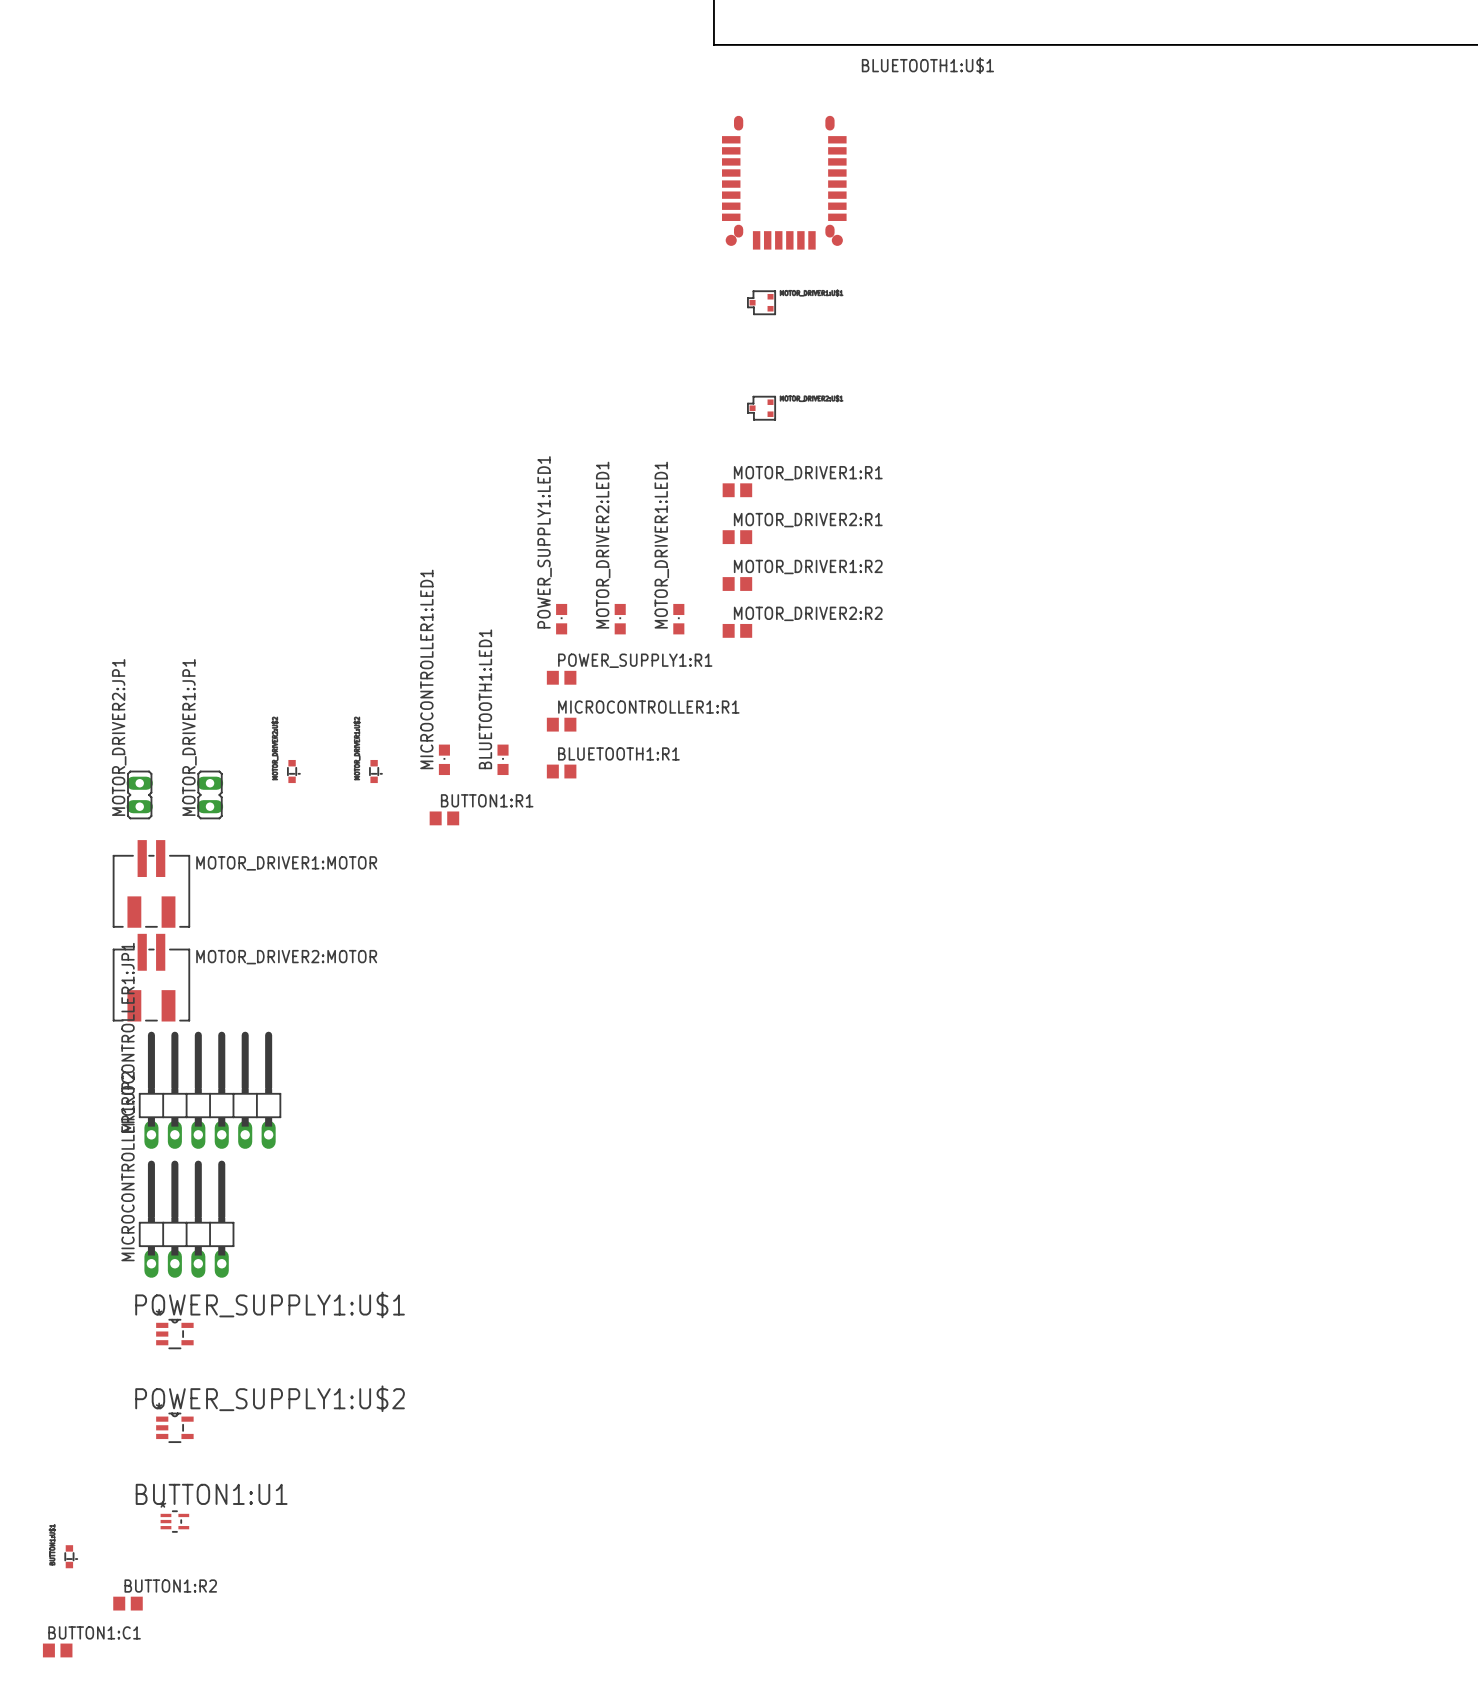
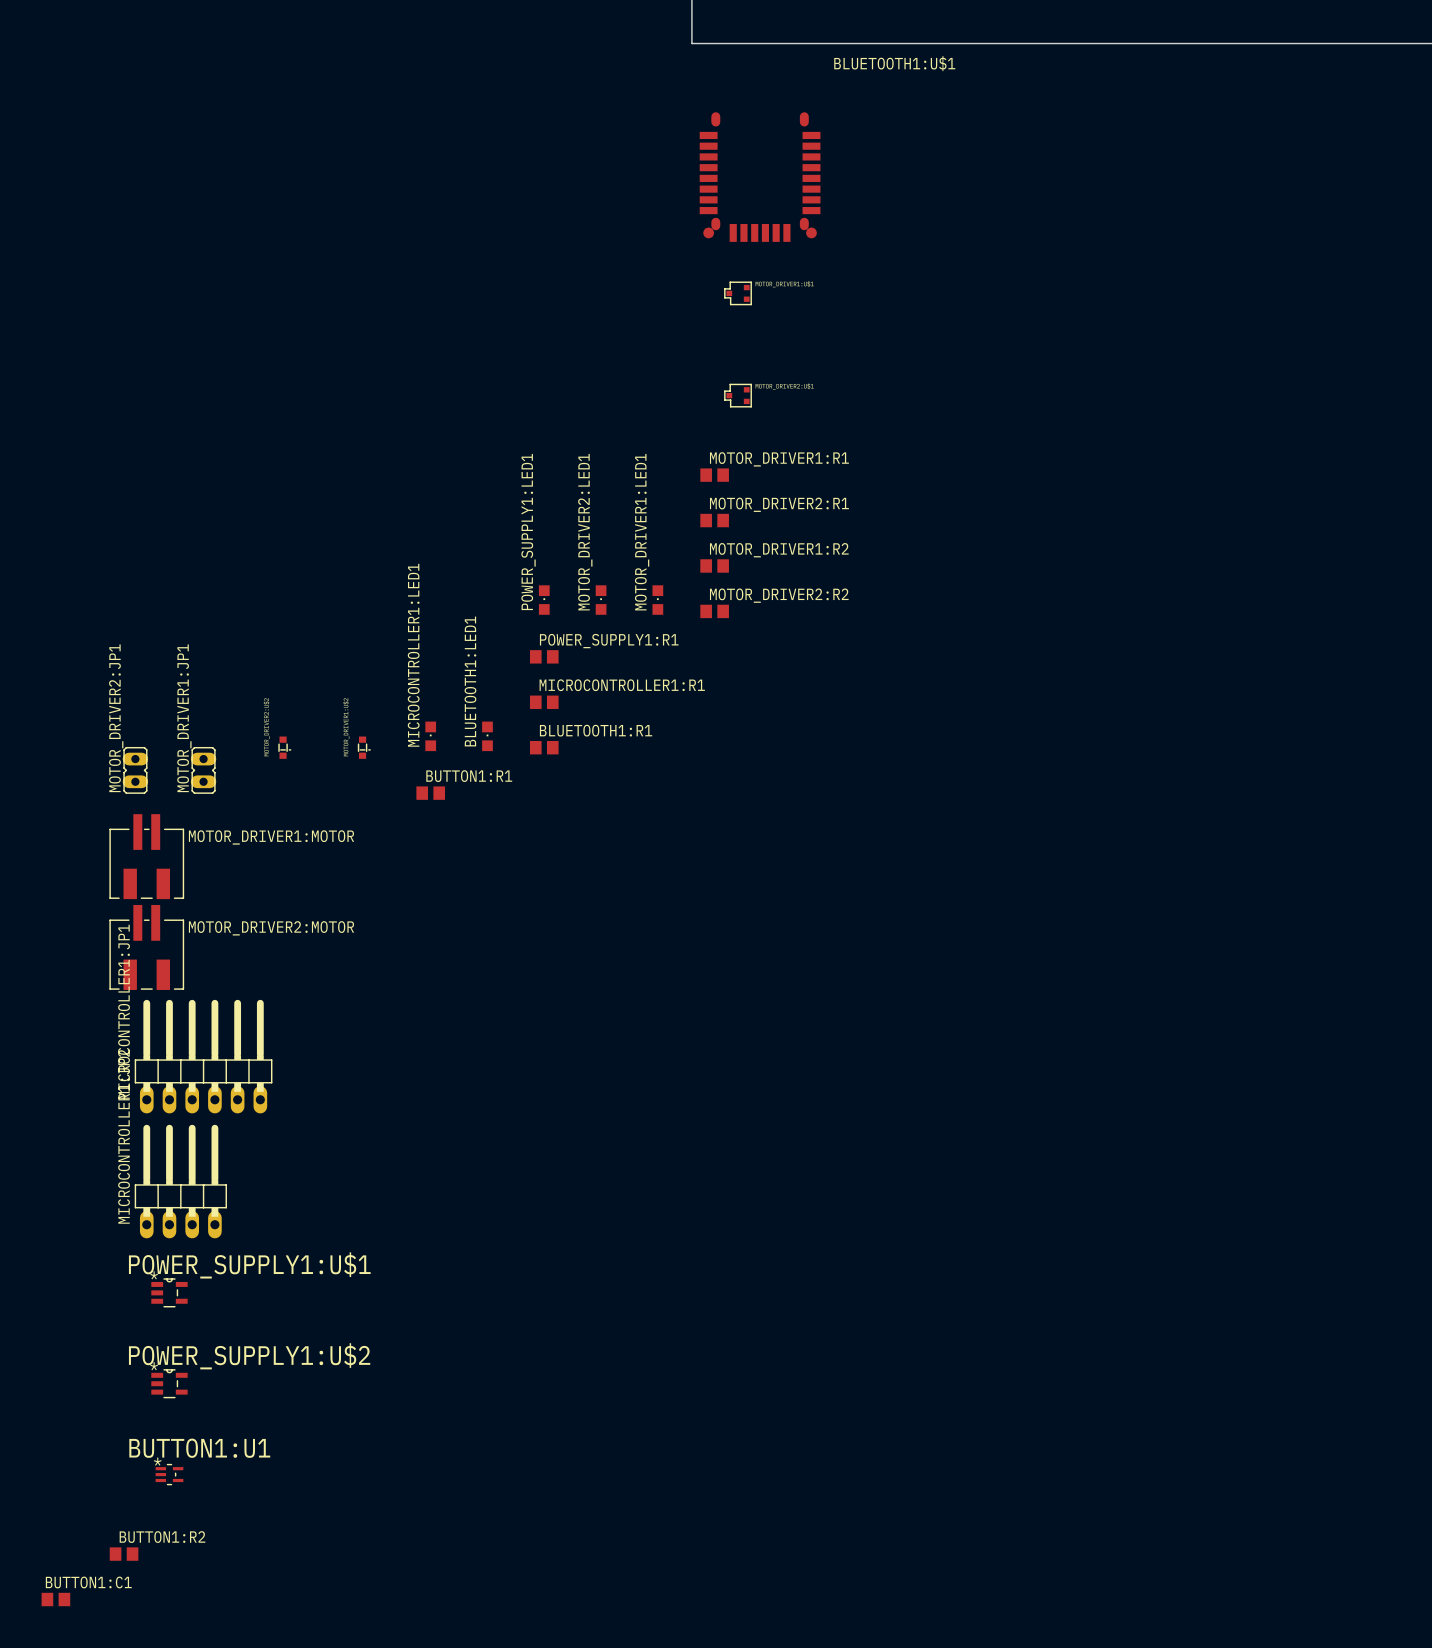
part: (71, 1556) -> none

